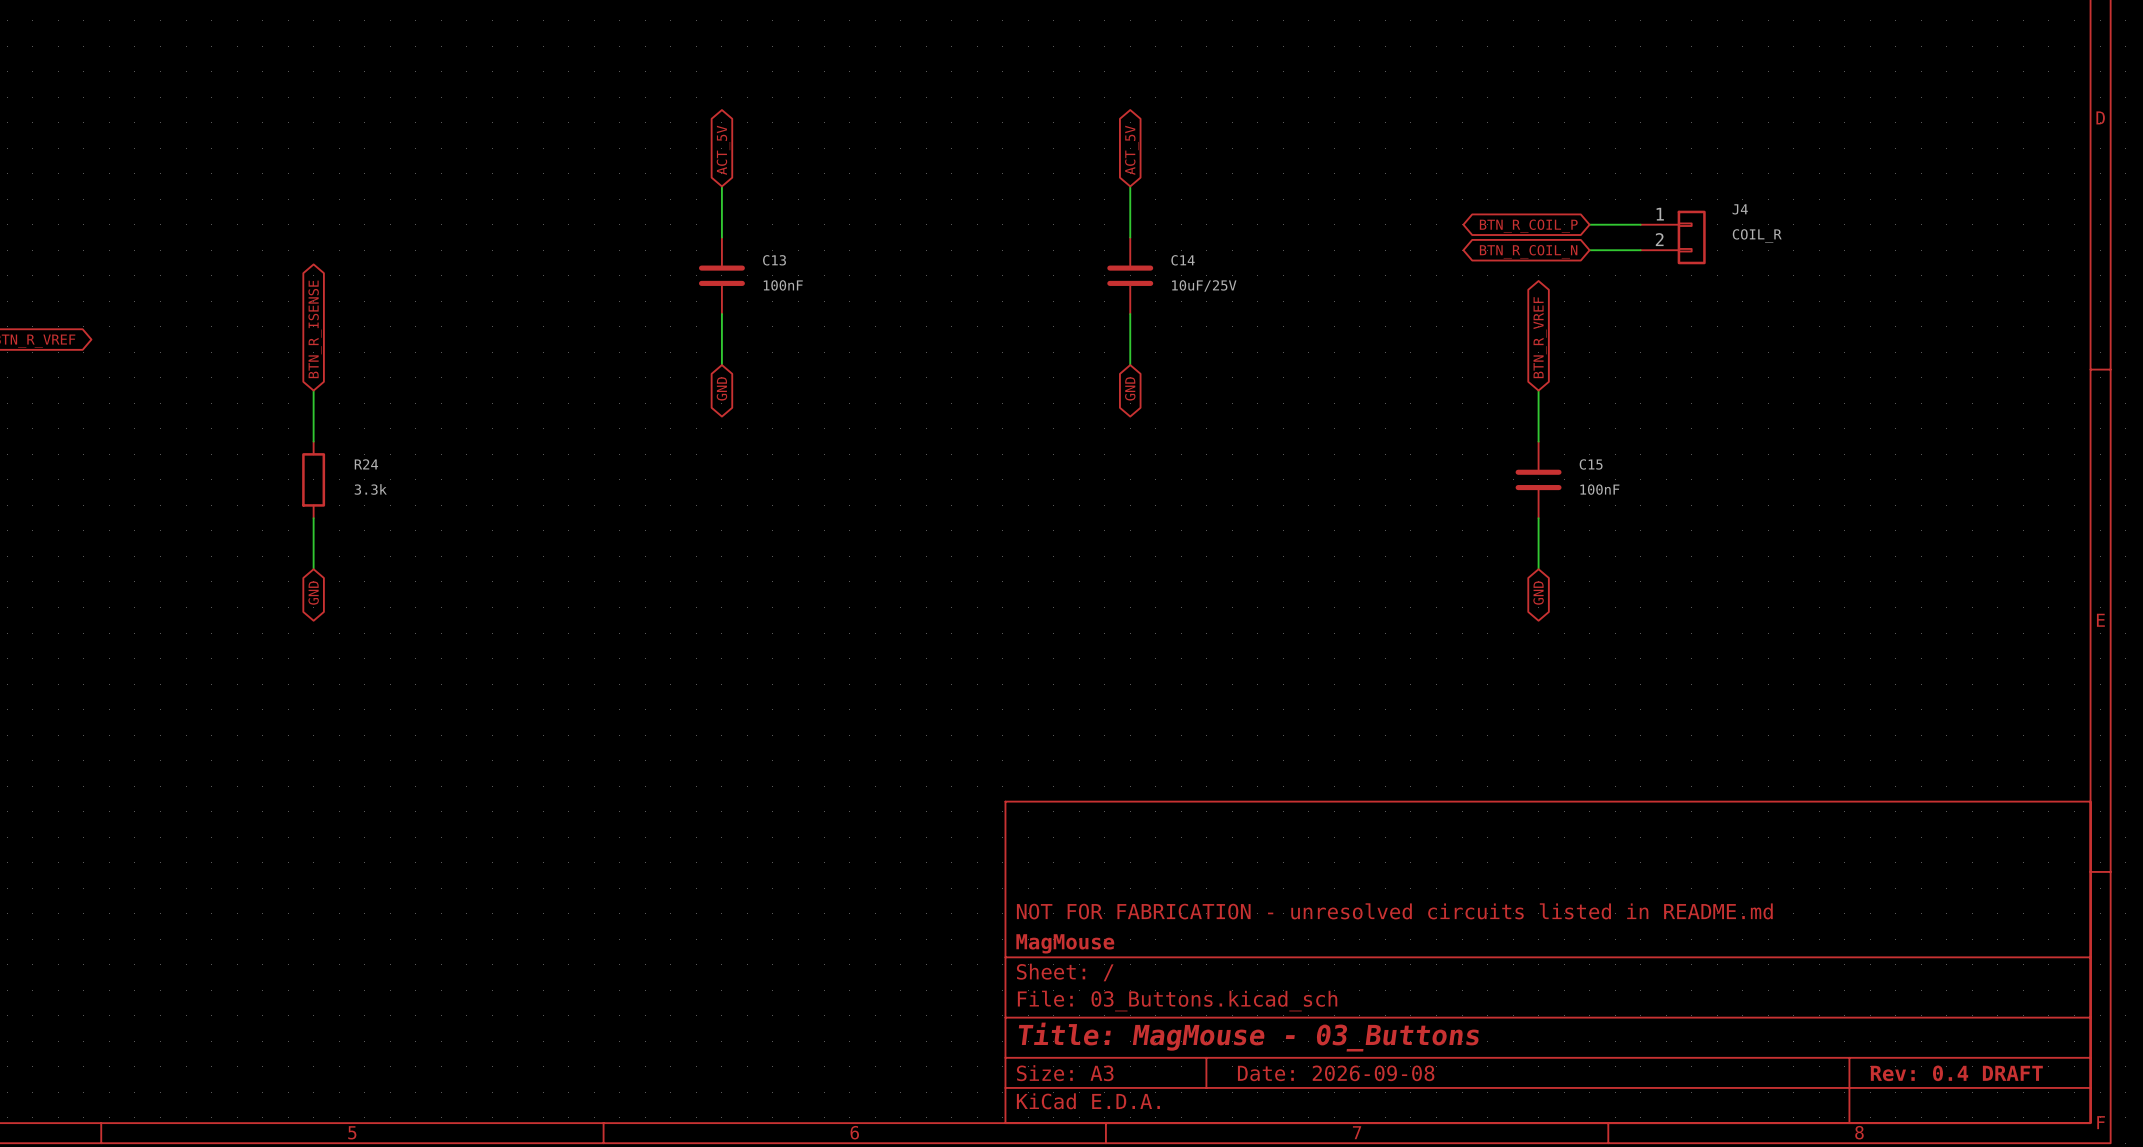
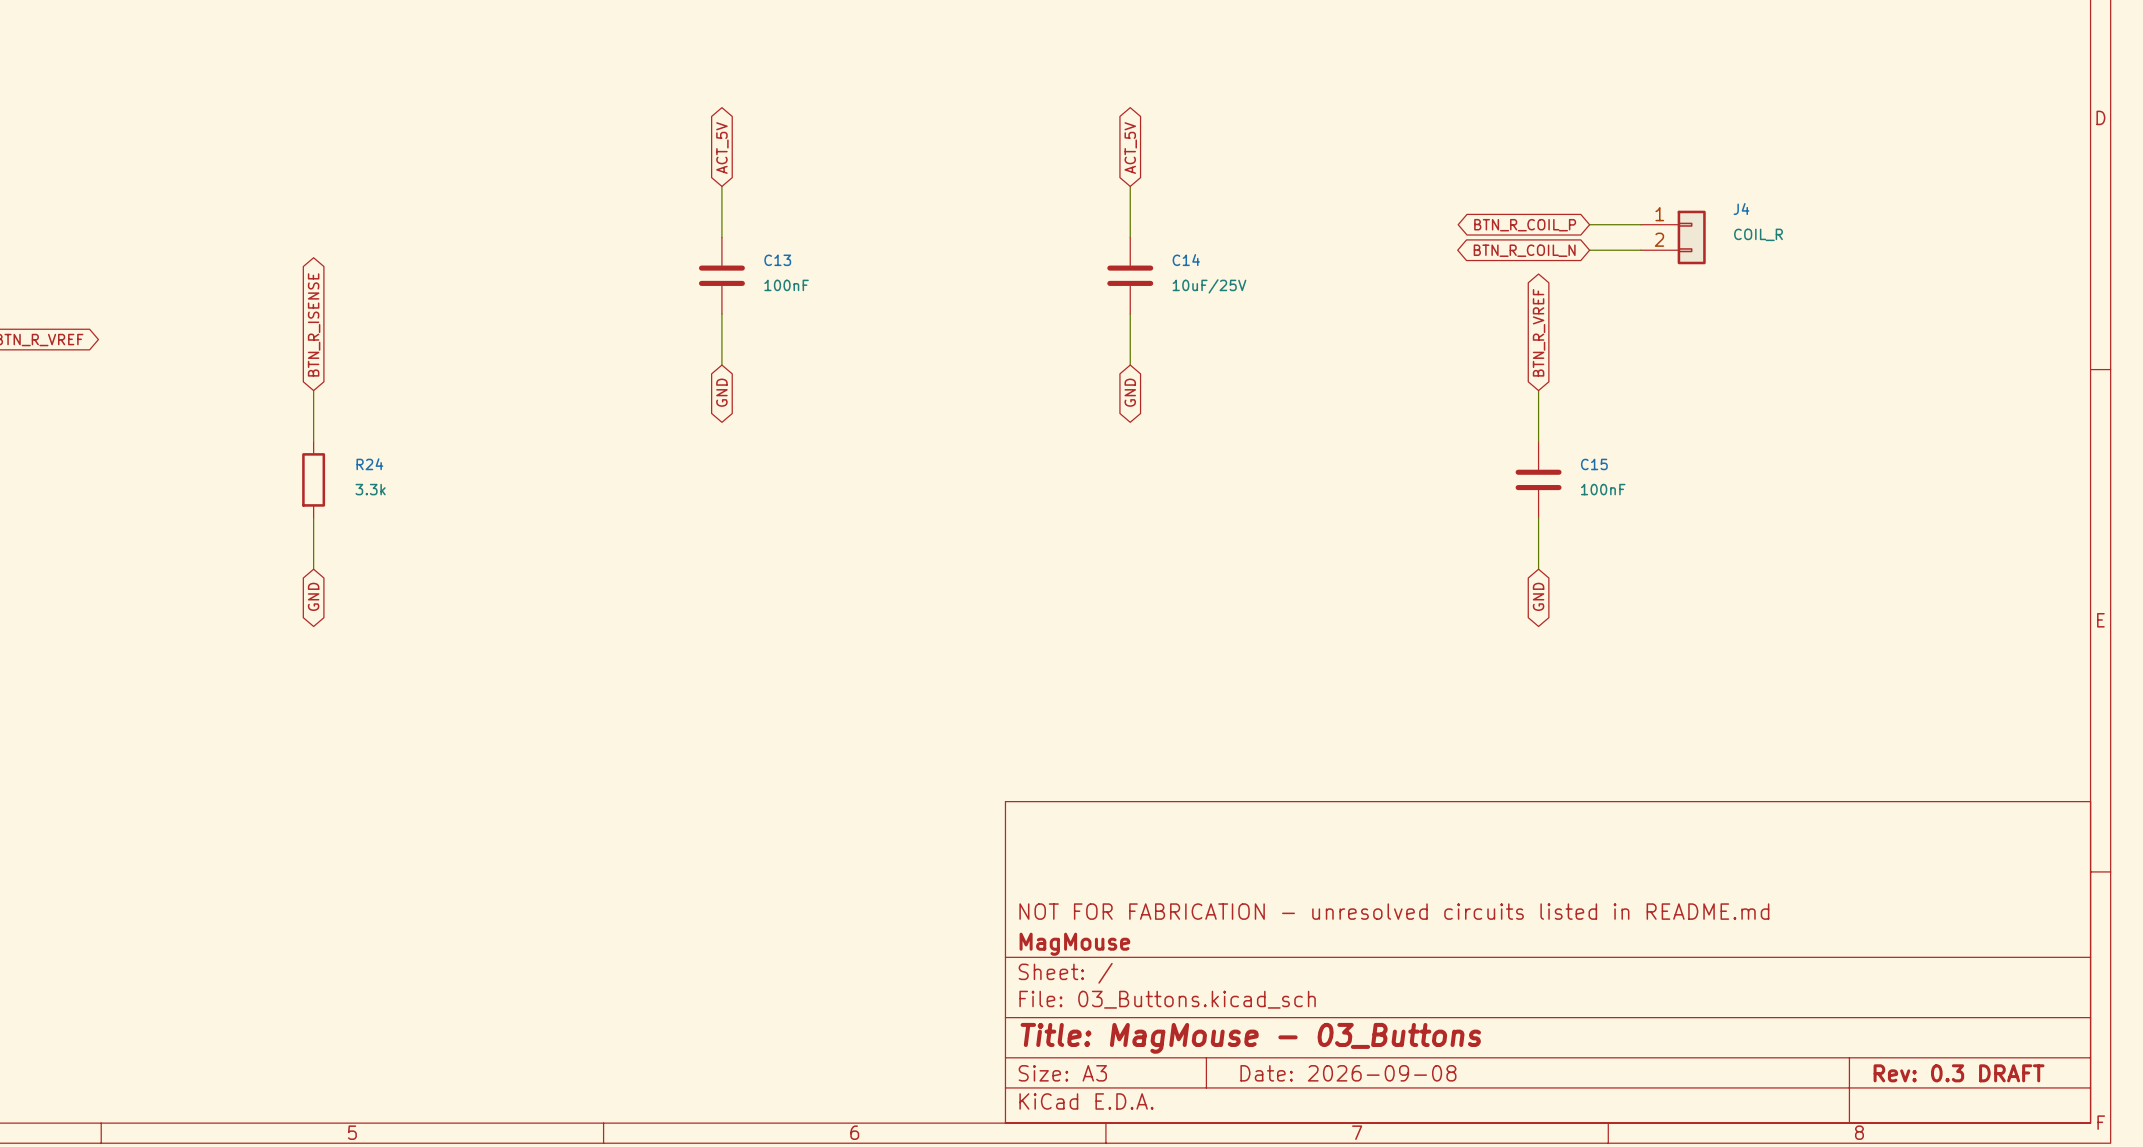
title block: Rev: 0.4 DRAFT (1956, 1073) -> Rev: 0.3 DRAFT (1959, 1073)

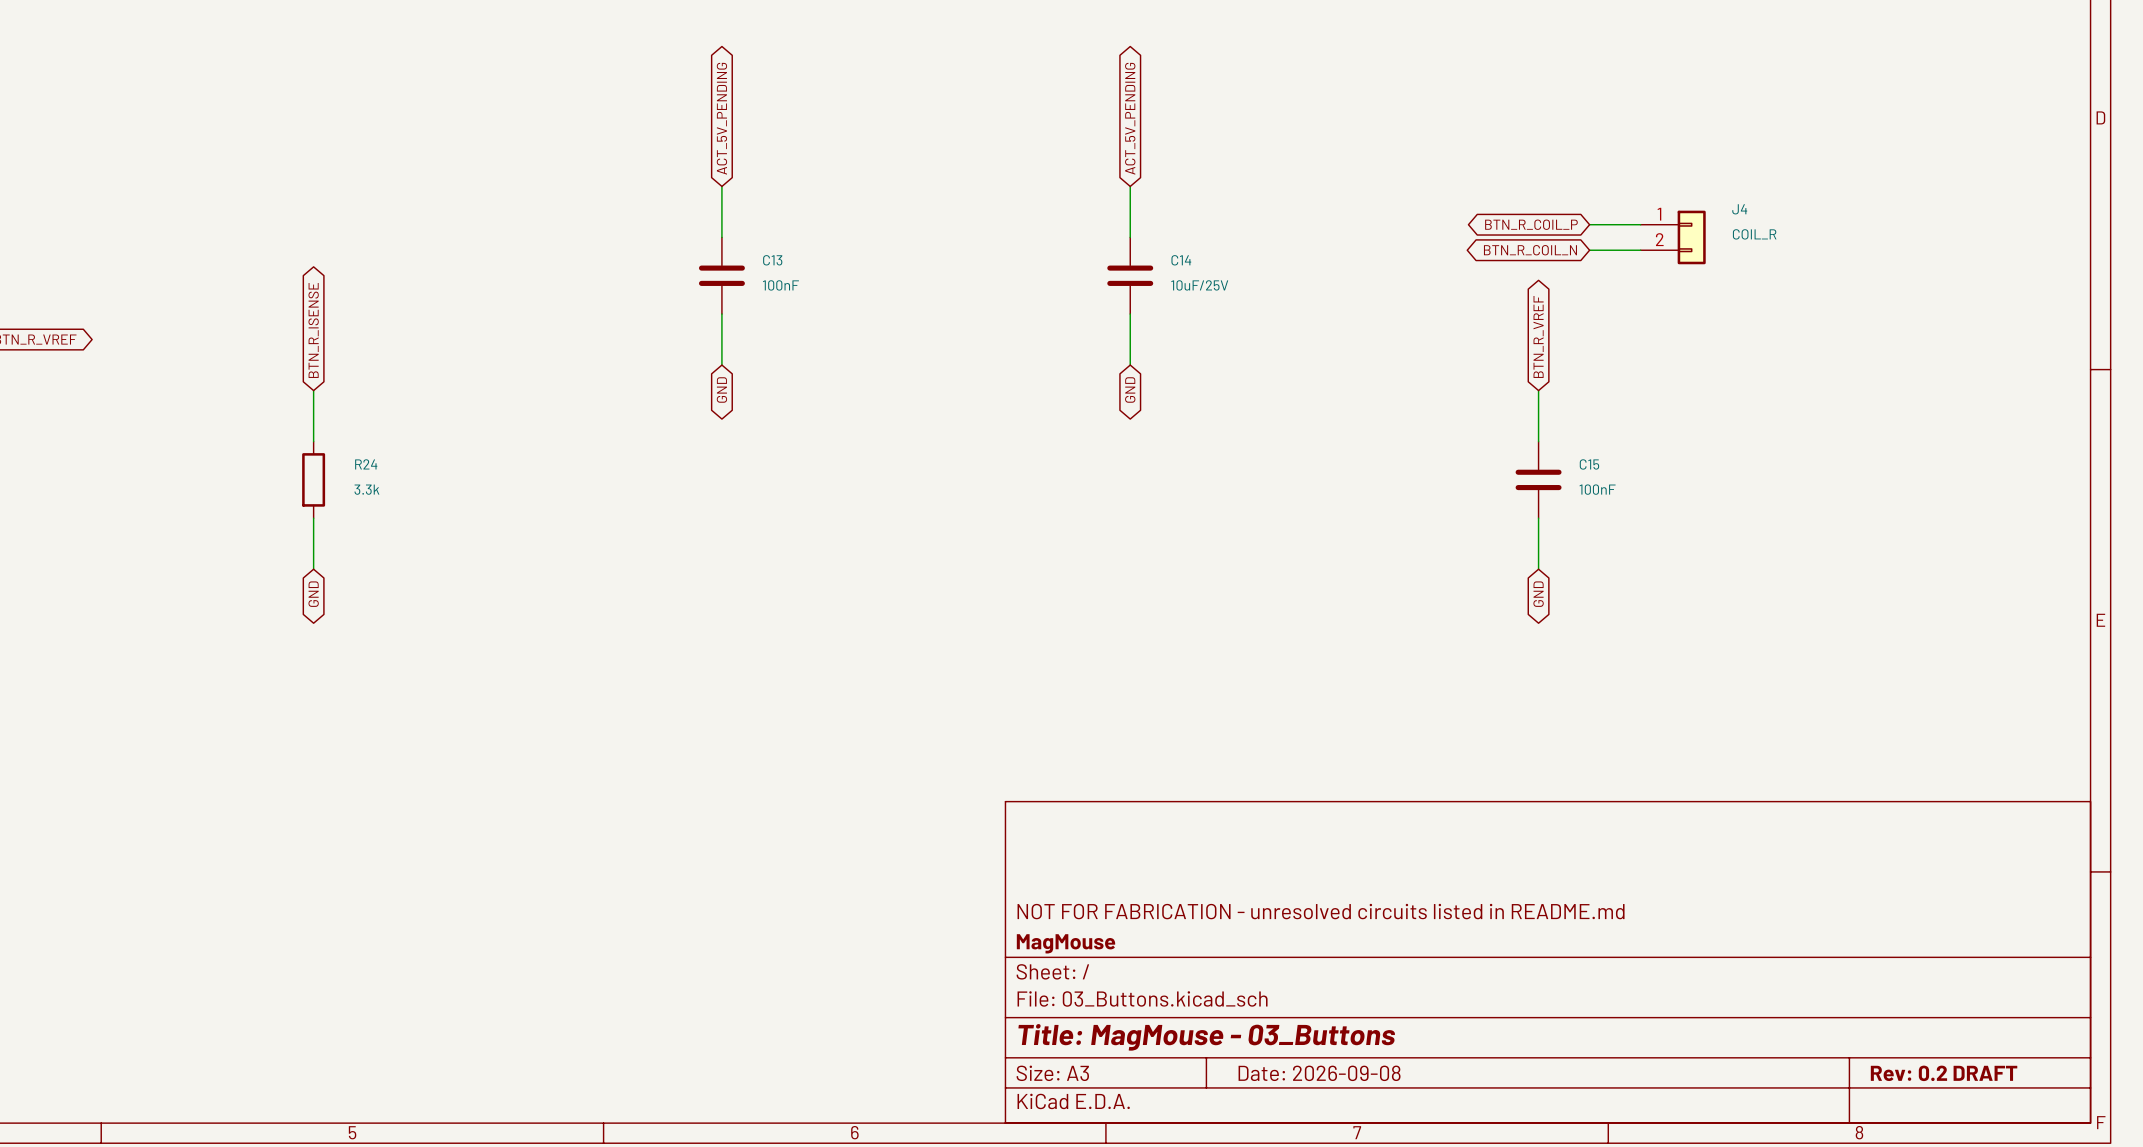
global label: ACT_5V (722, 148) -> ACT_5V_PENDING (721, 118)
global label: ACT_5V (1130, 148) -> ACT_5V_PENDING (1130, 118)
title block: Rev: 0.3 DRAFT (1959, 1073) -> Rev: 0.2 DRAFT (1944, 1073)

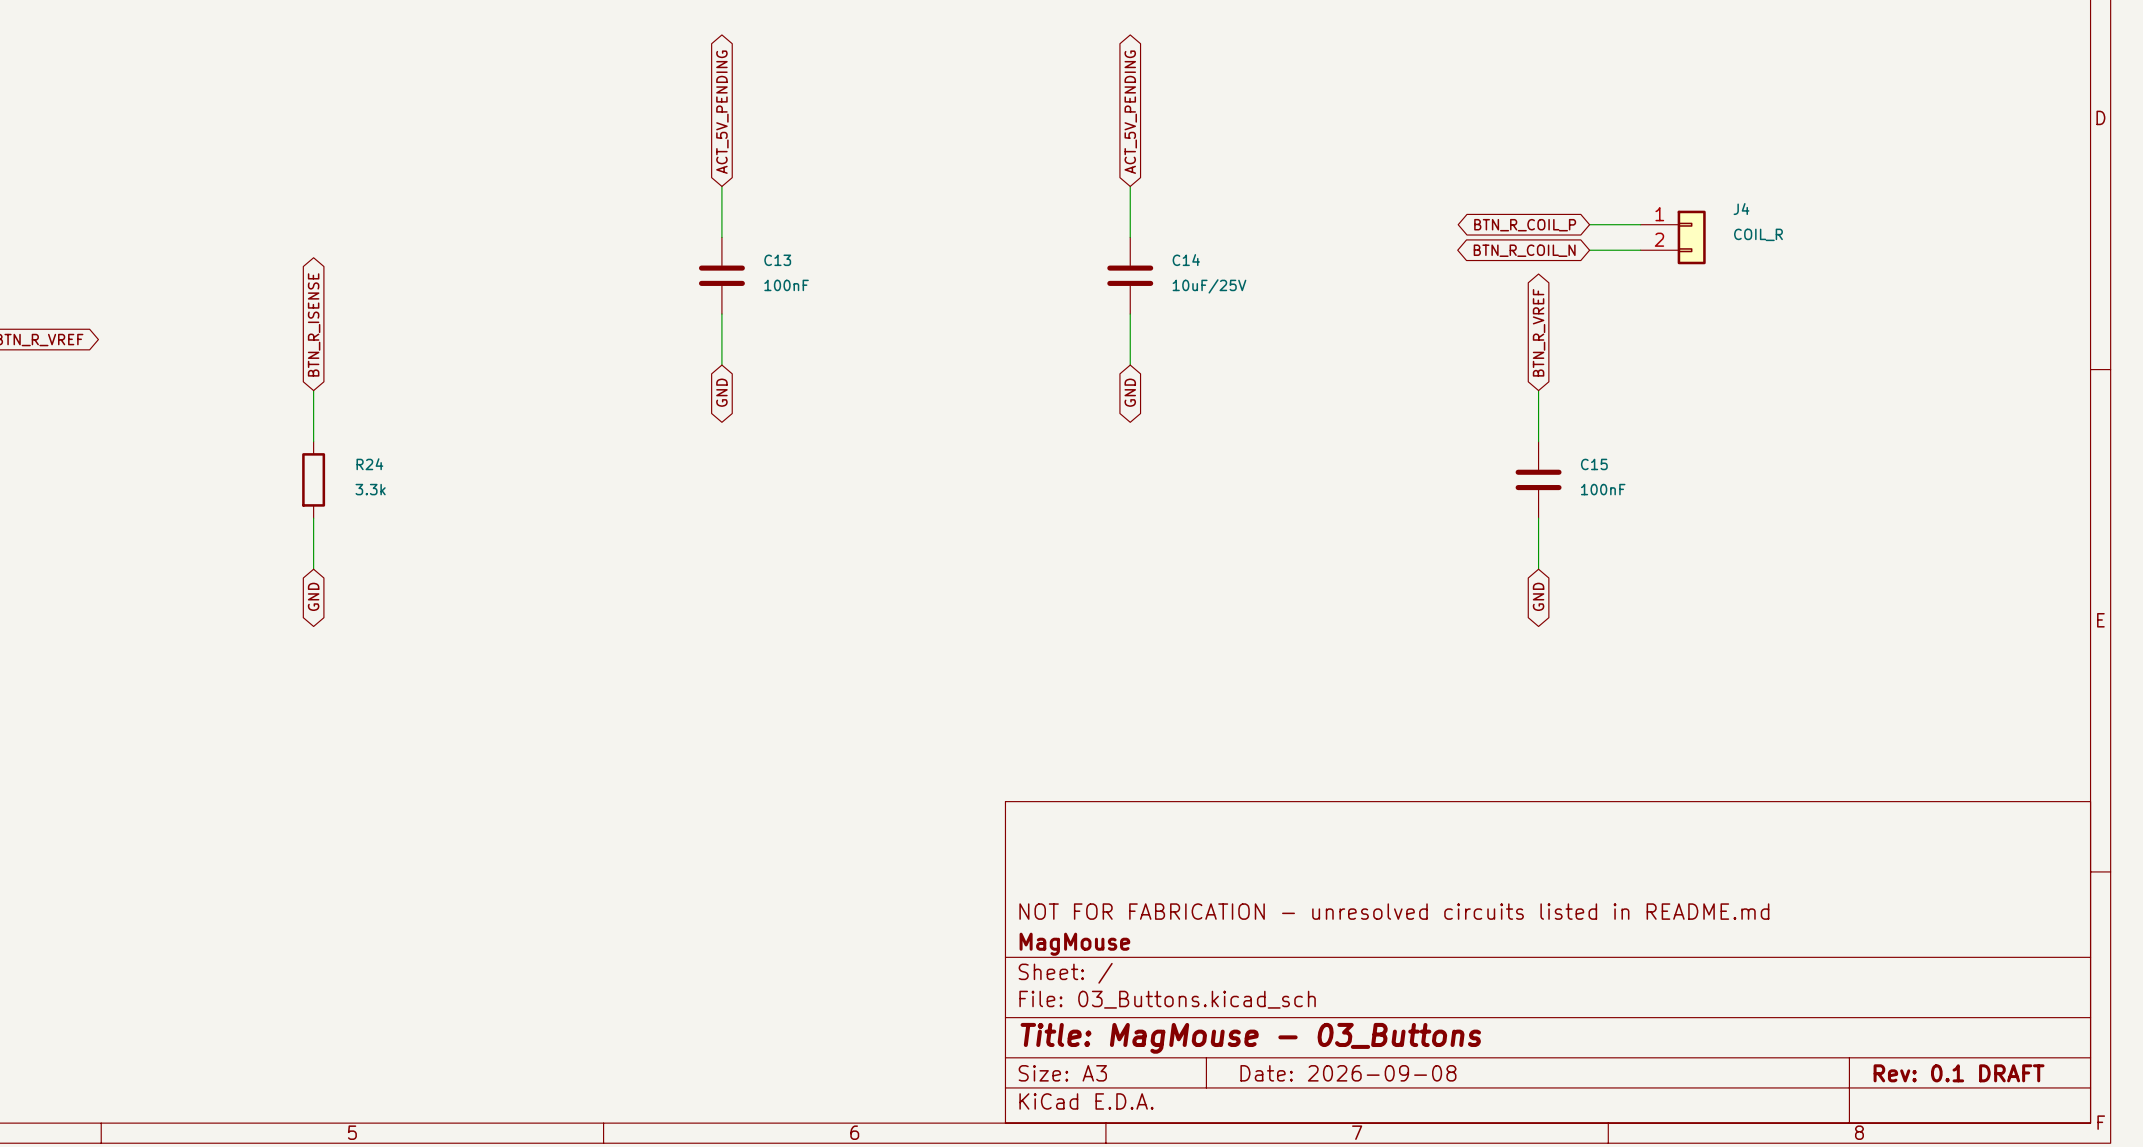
title block: Rev: 0.2 DRAFT (1944, 1073) -> Rev: 0.1 DRAFT (1959, 1073)

